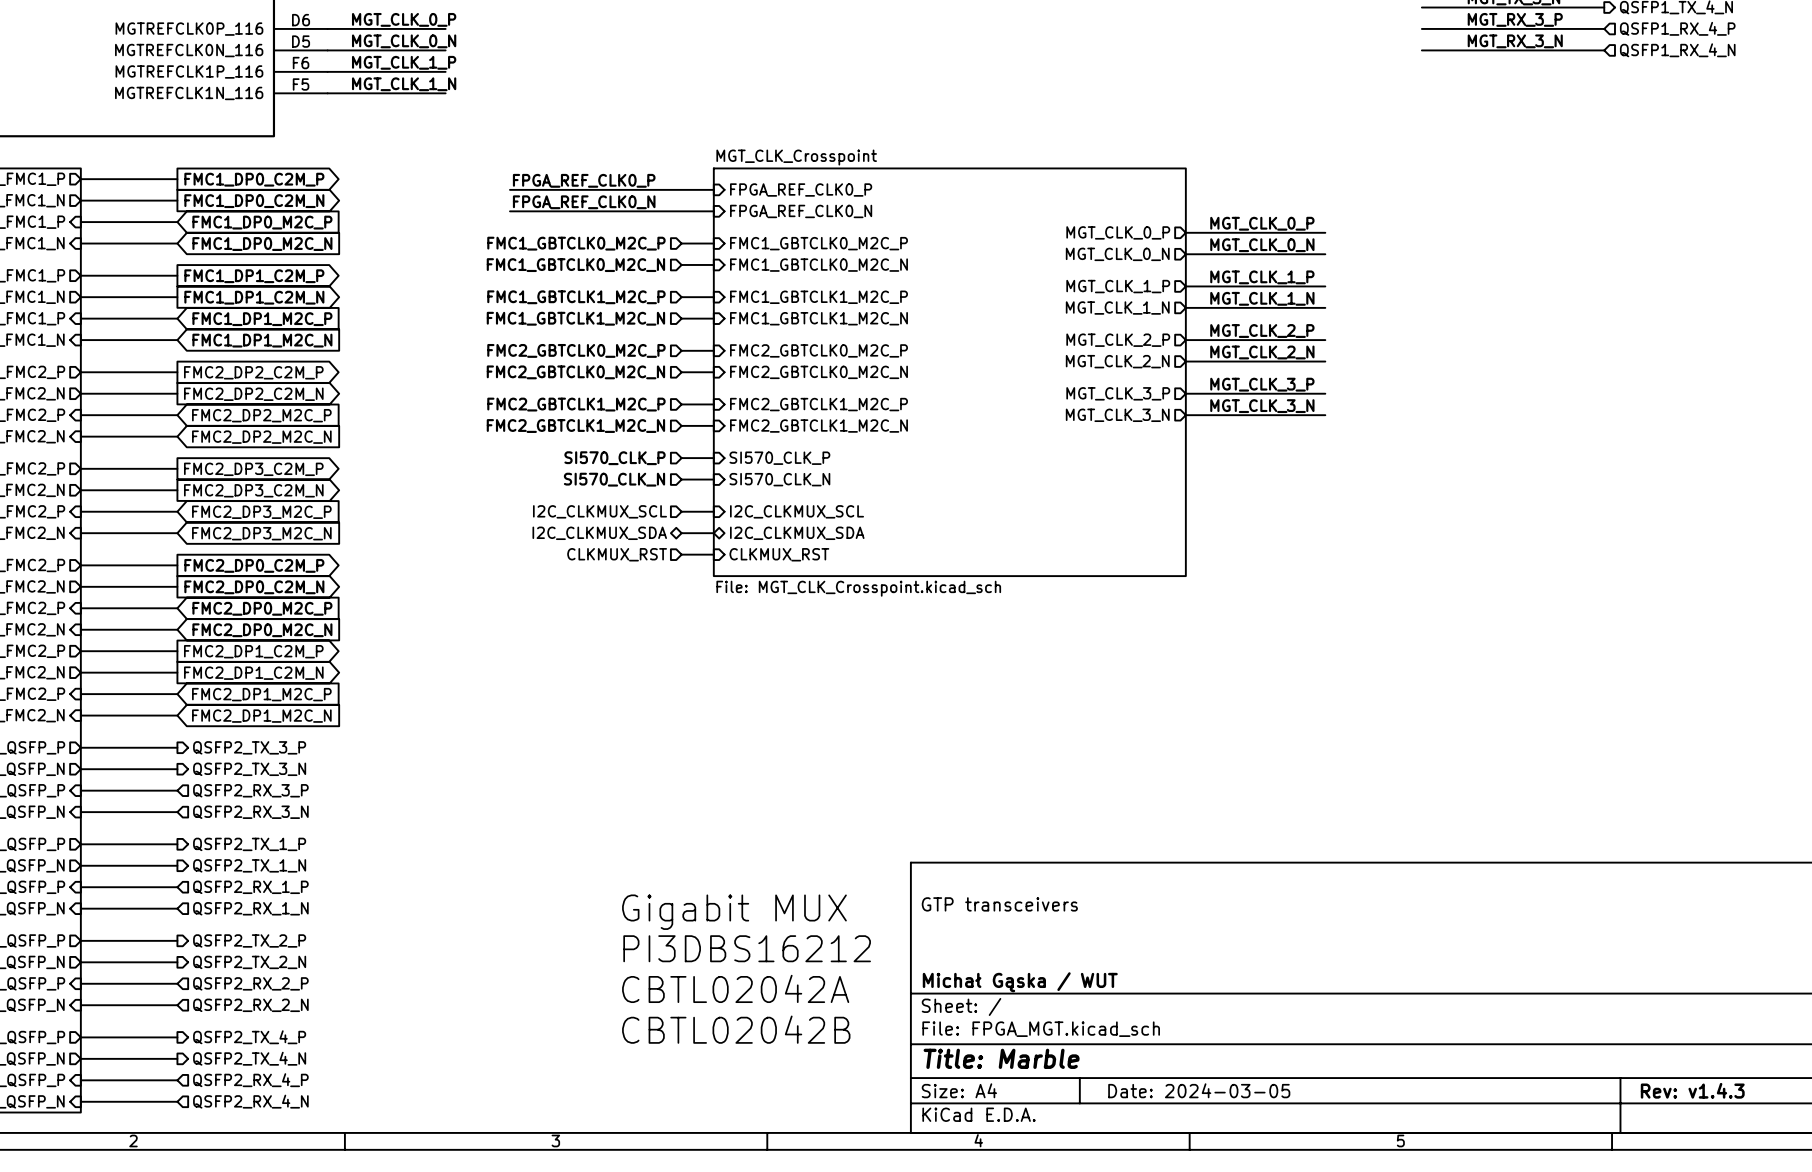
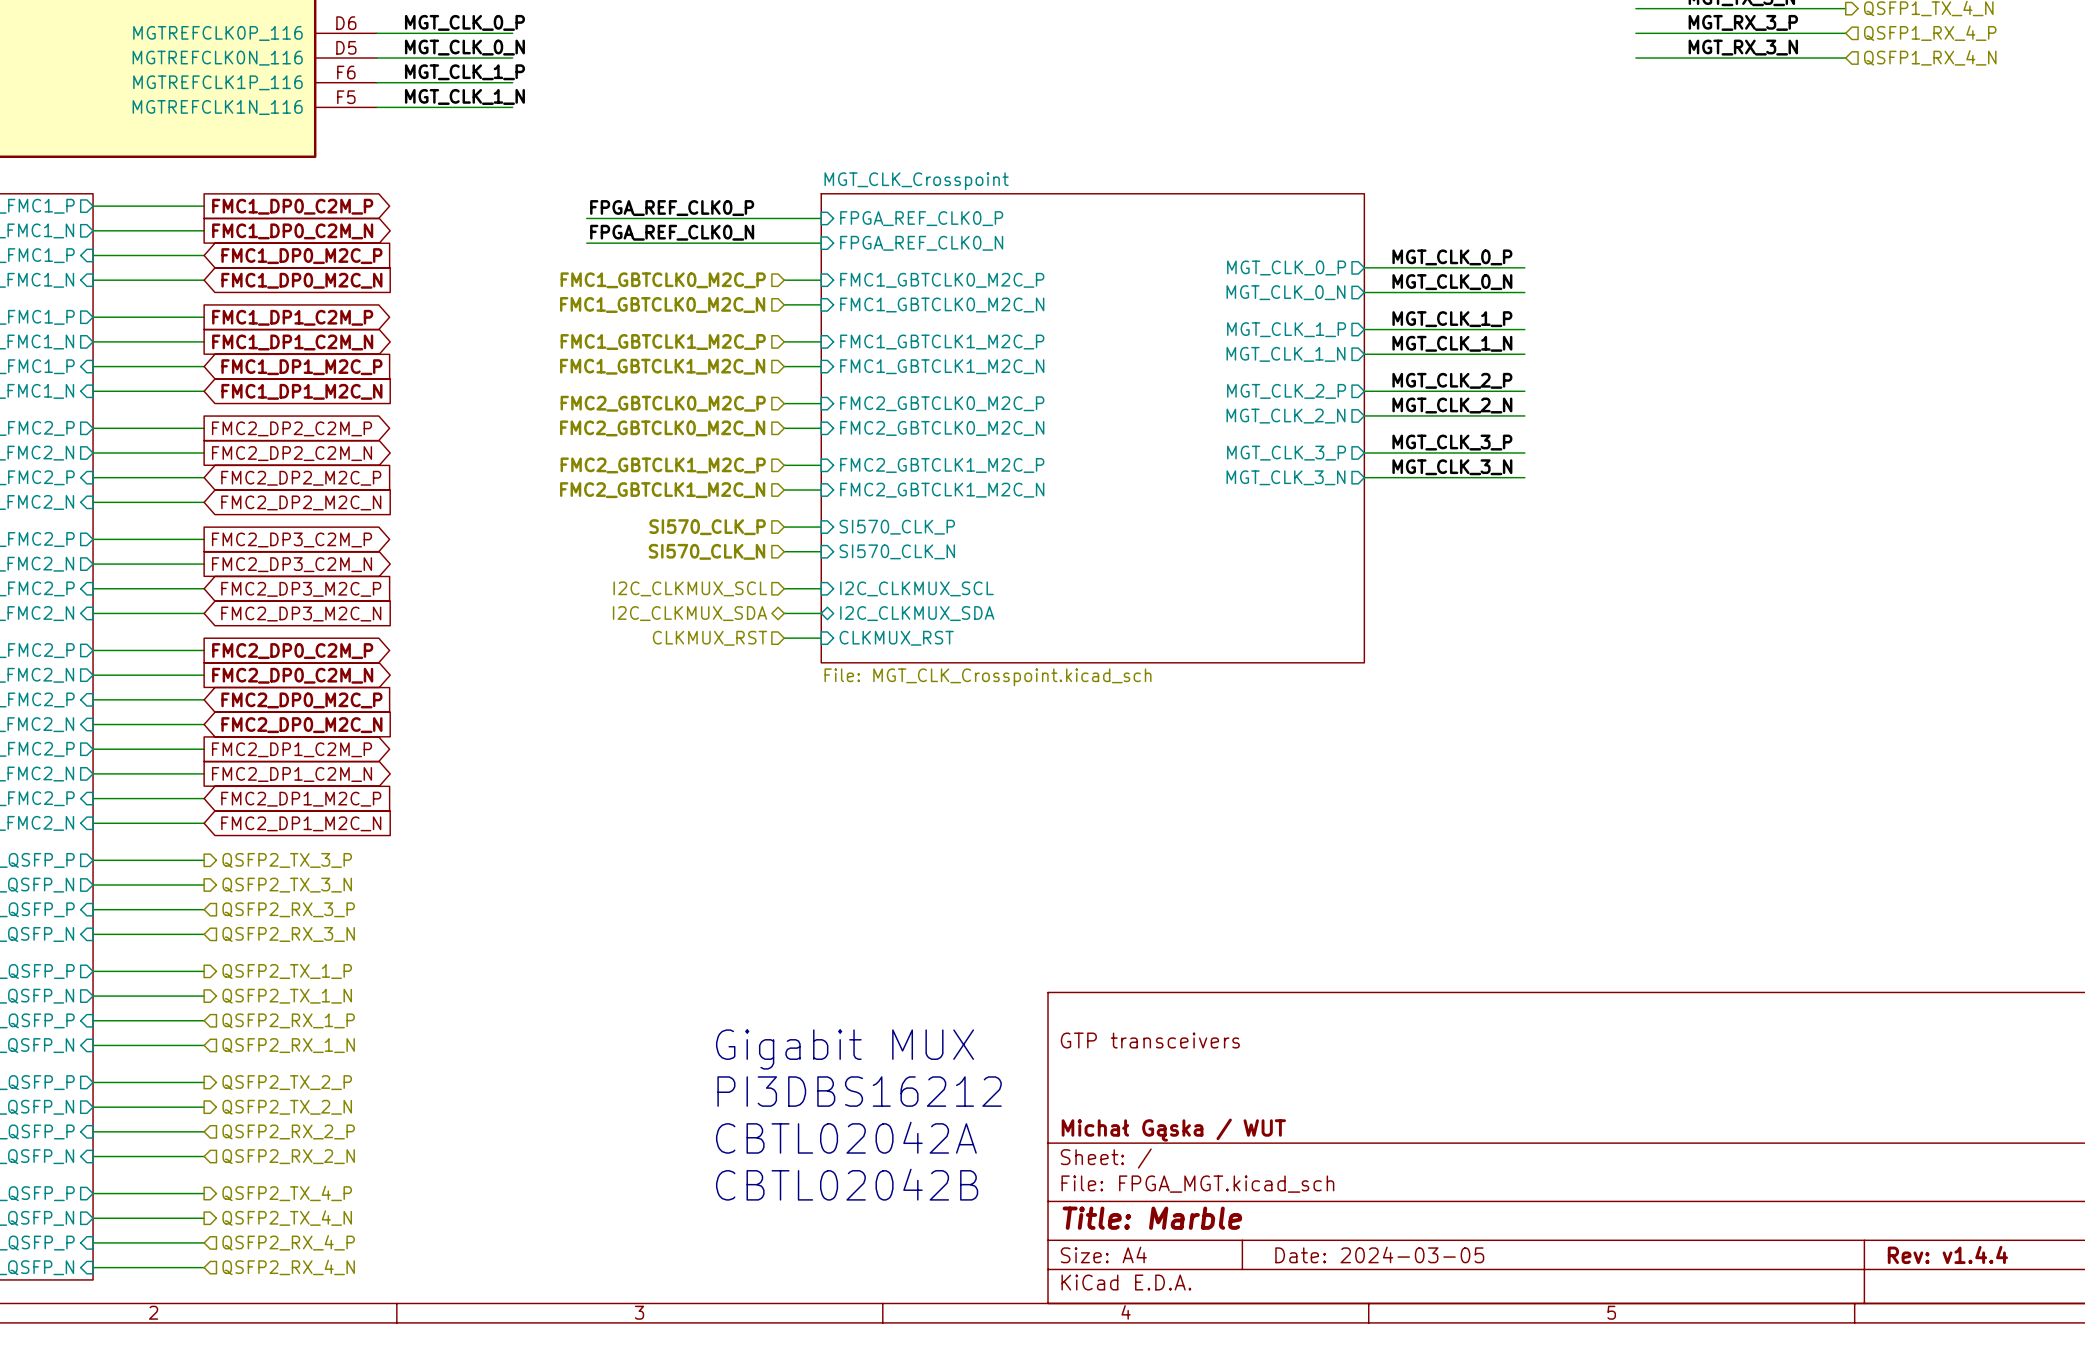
title block: Rev: v1.4.3 (1692, 1090) -> Rev: v1.4.4 (1947, 1254)

